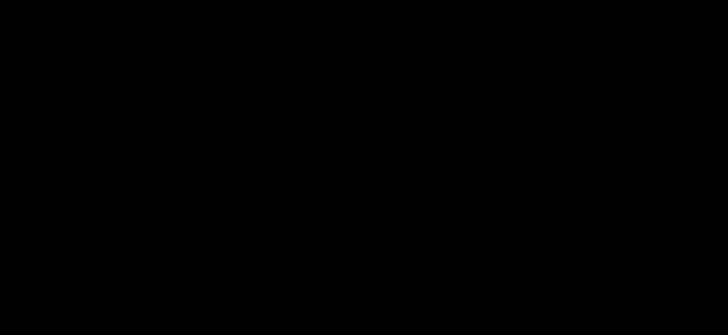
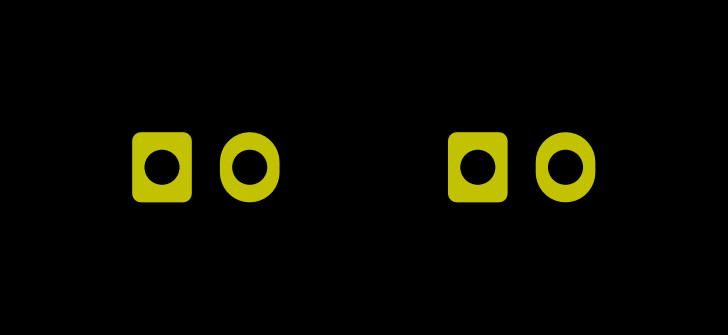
part: none -> (205, 167)
part: none -> (521, 167)

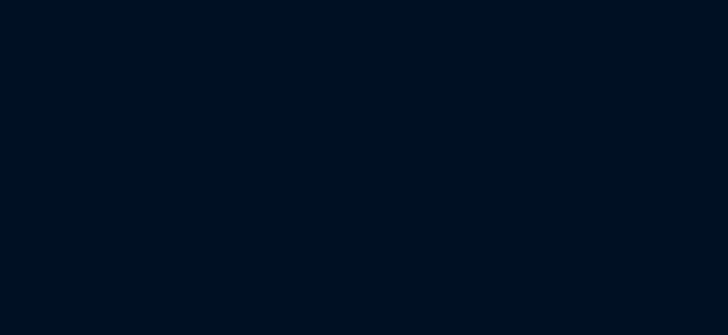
part: (205, 167) -> none
part: (521, 167) -> none

